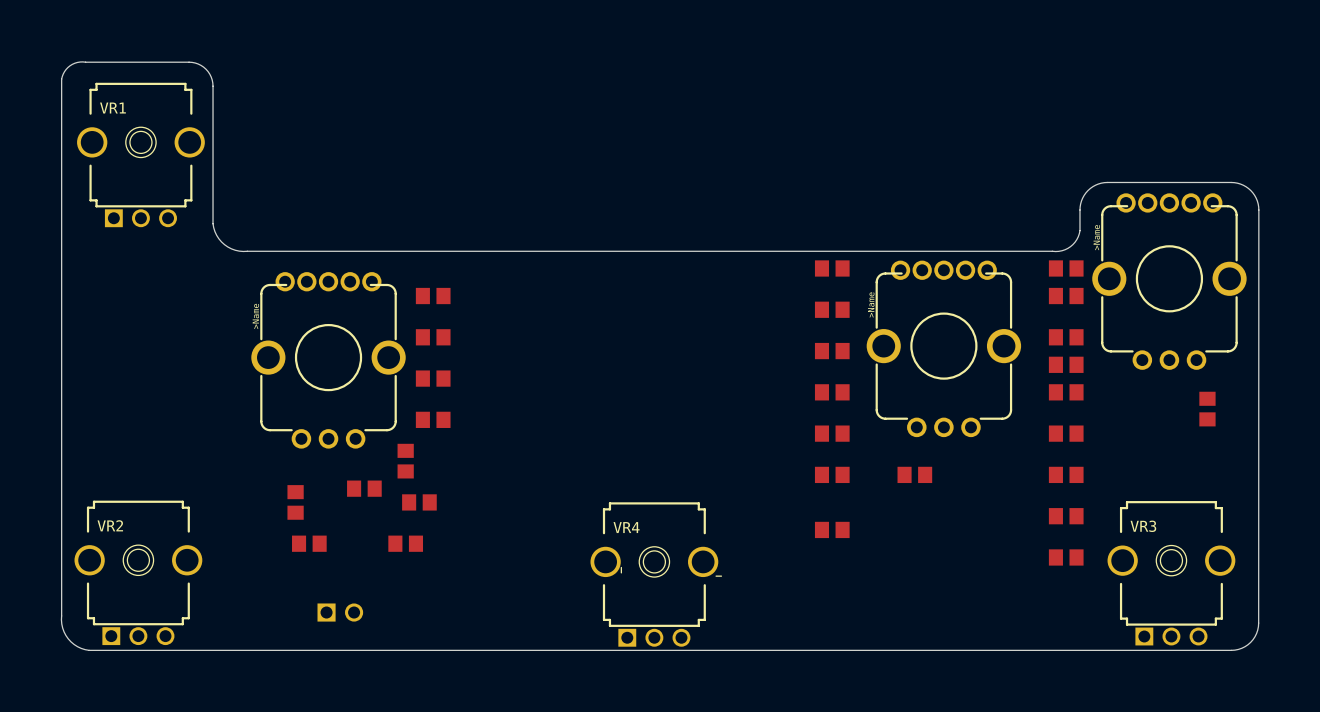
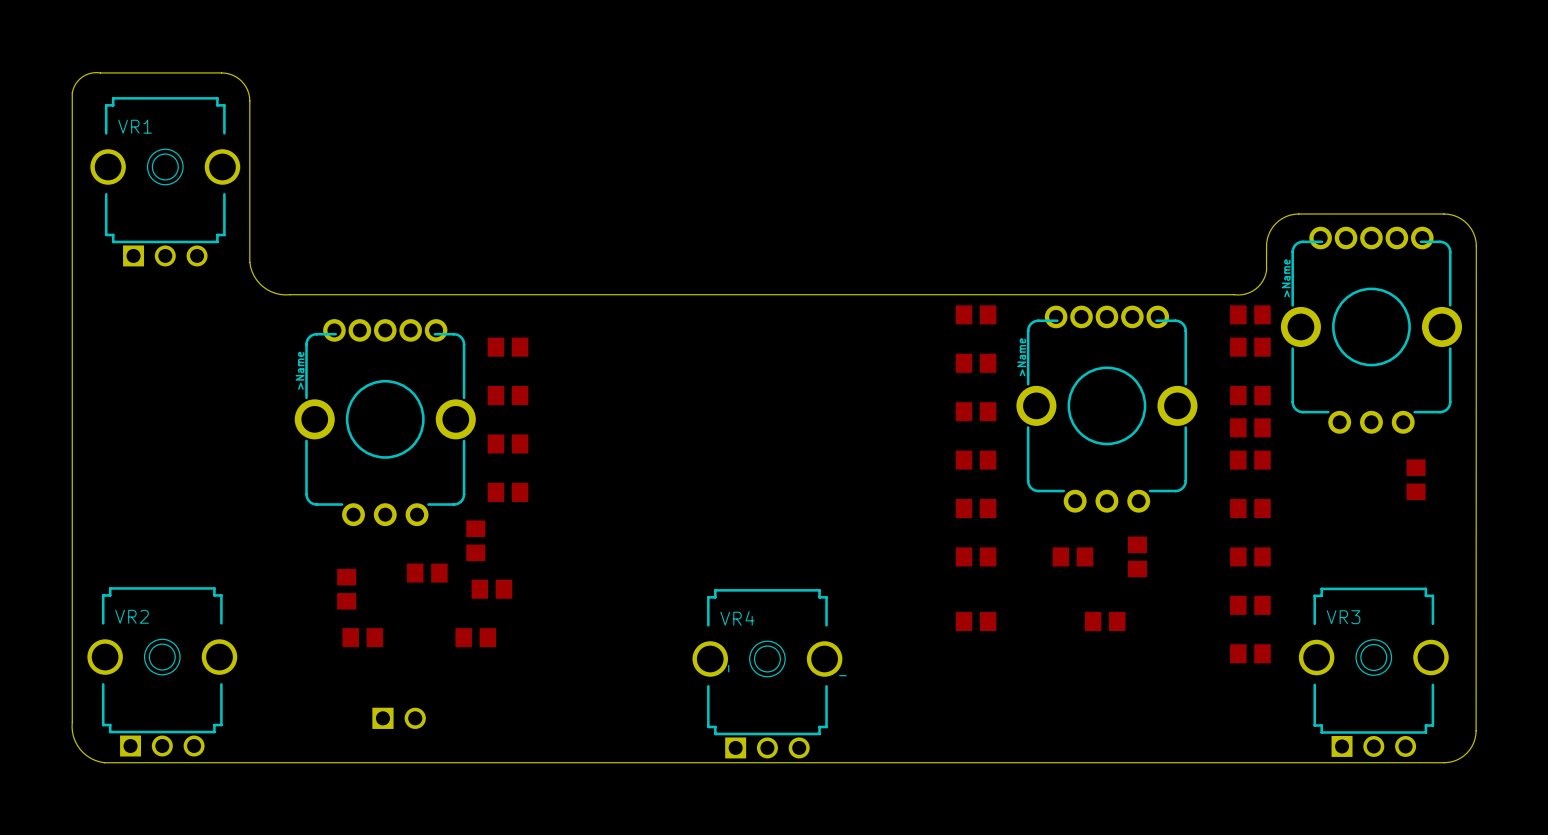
part: none -> (1137, 556)
part: none -> (1105, 621)

